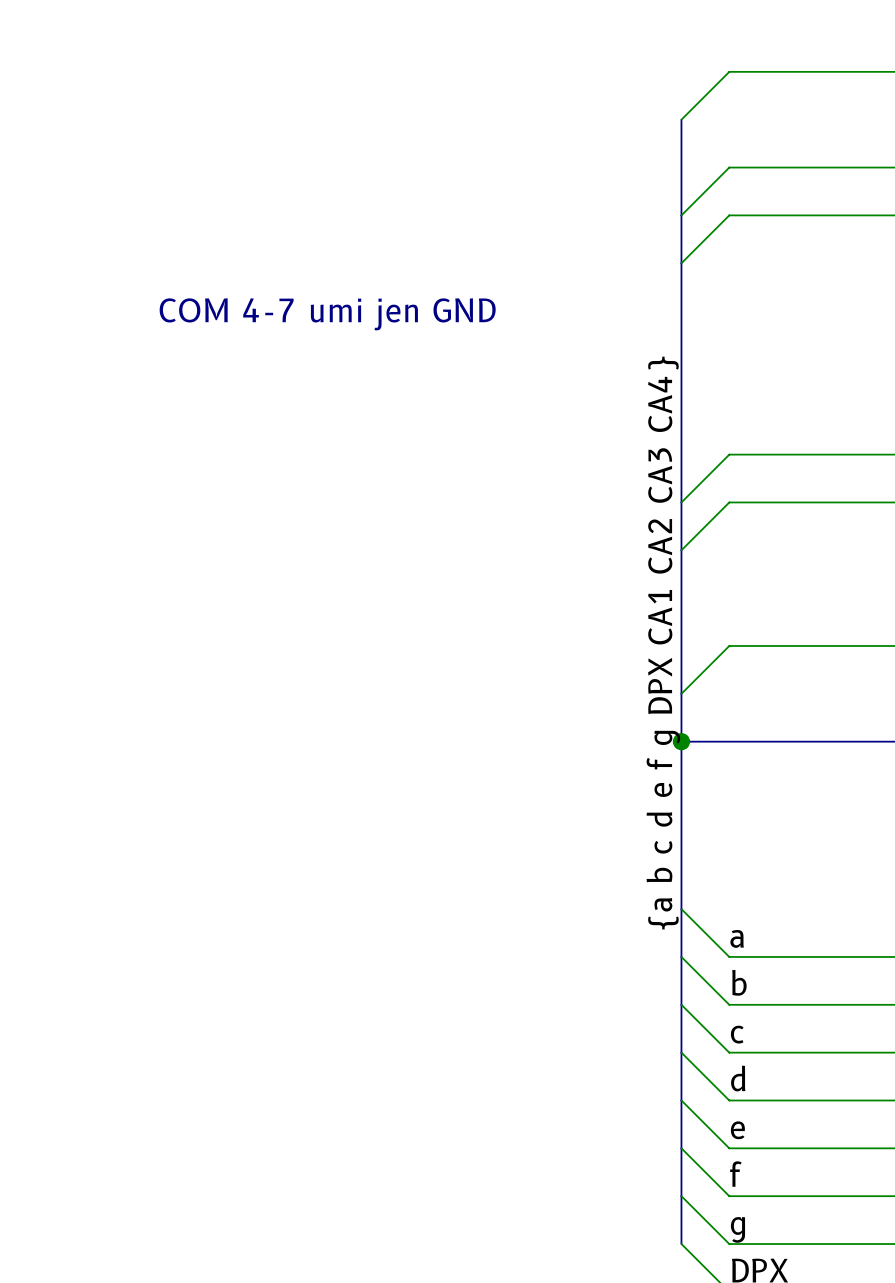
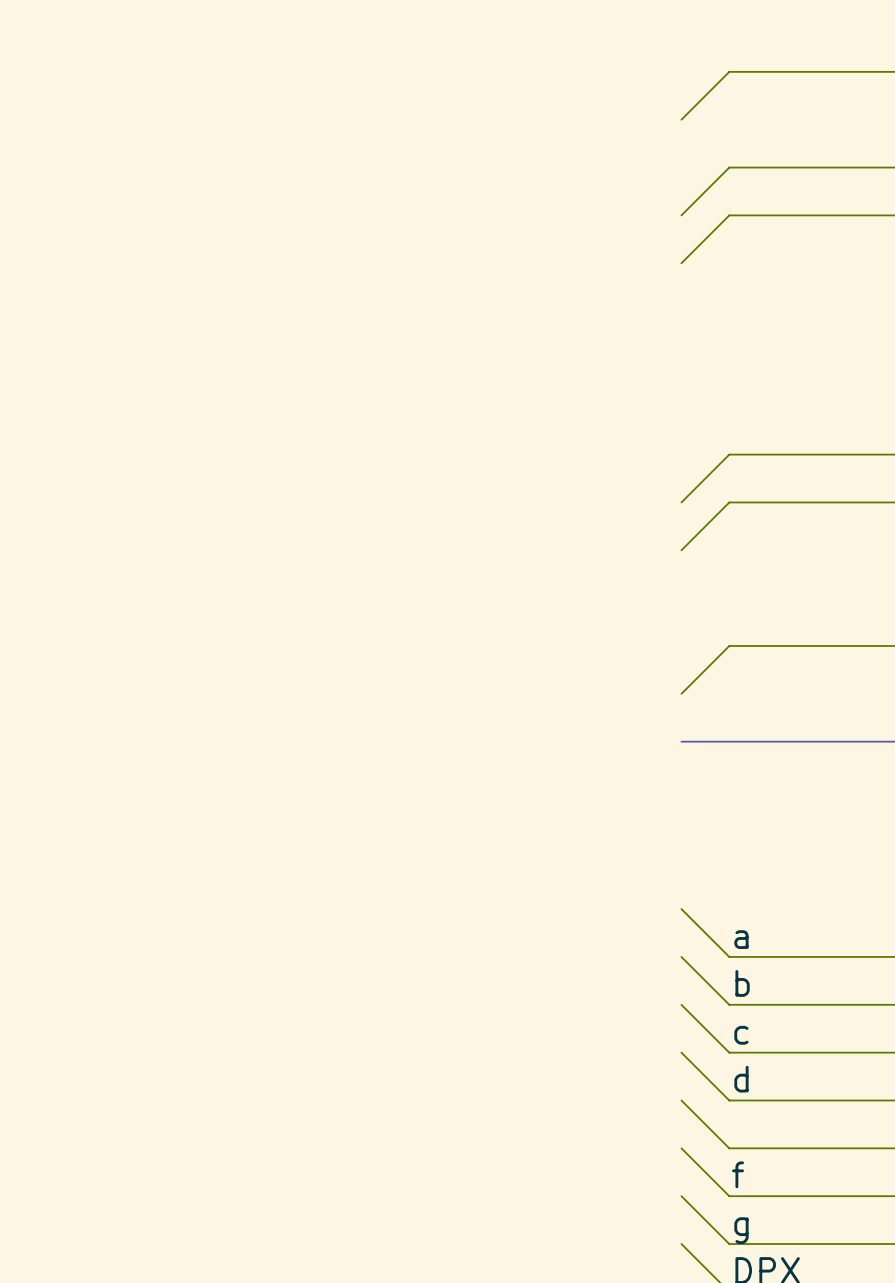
bus: (681, 119) (681, 1244) -> none
text: COM 4-7 umi jen GND (327, 314) -> none
label: {a b c d e f g DPX CA1 CA2 CA3 CA4} (663, 643) -> none
junction: (681, 741) -> none
label: e (737, 1130) -> none

